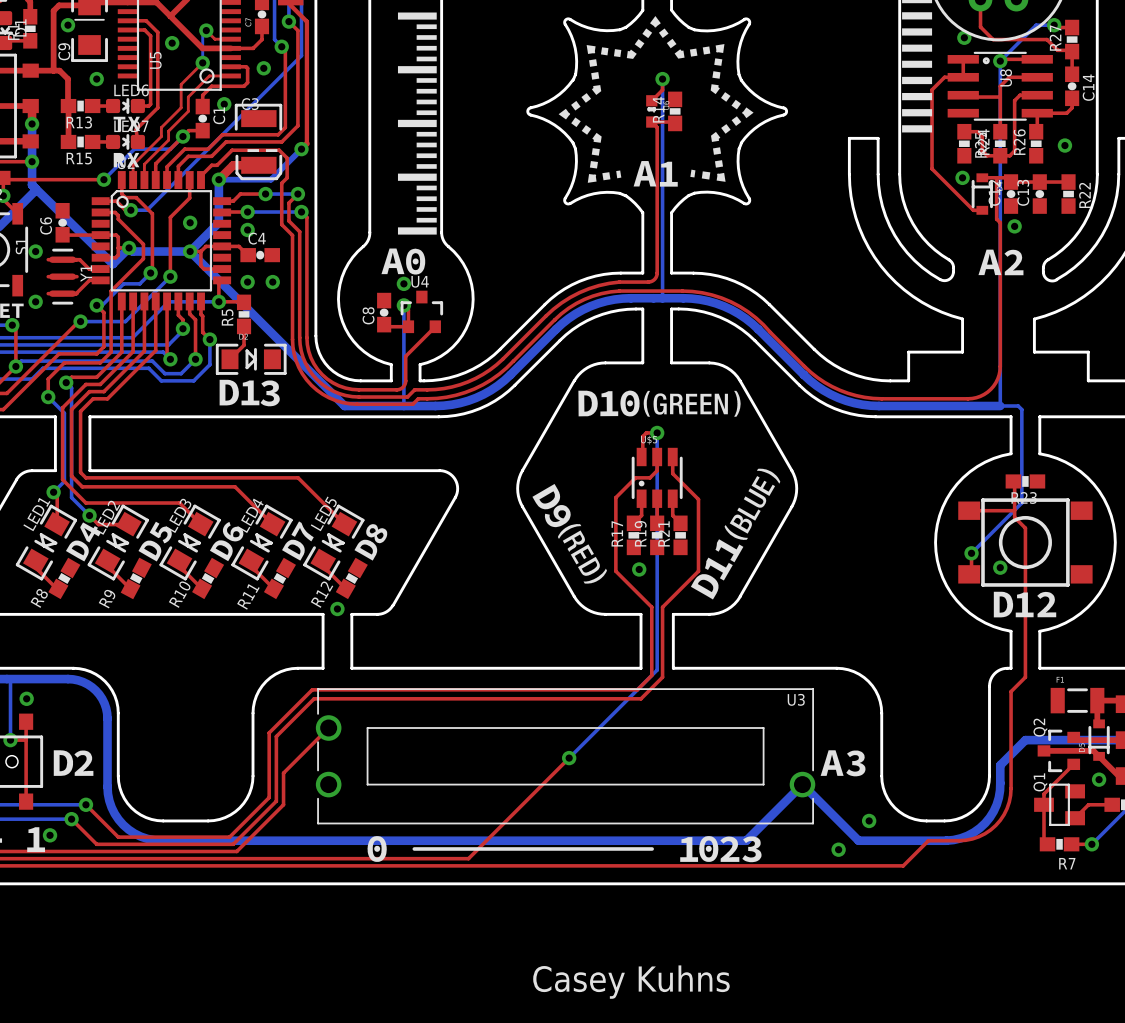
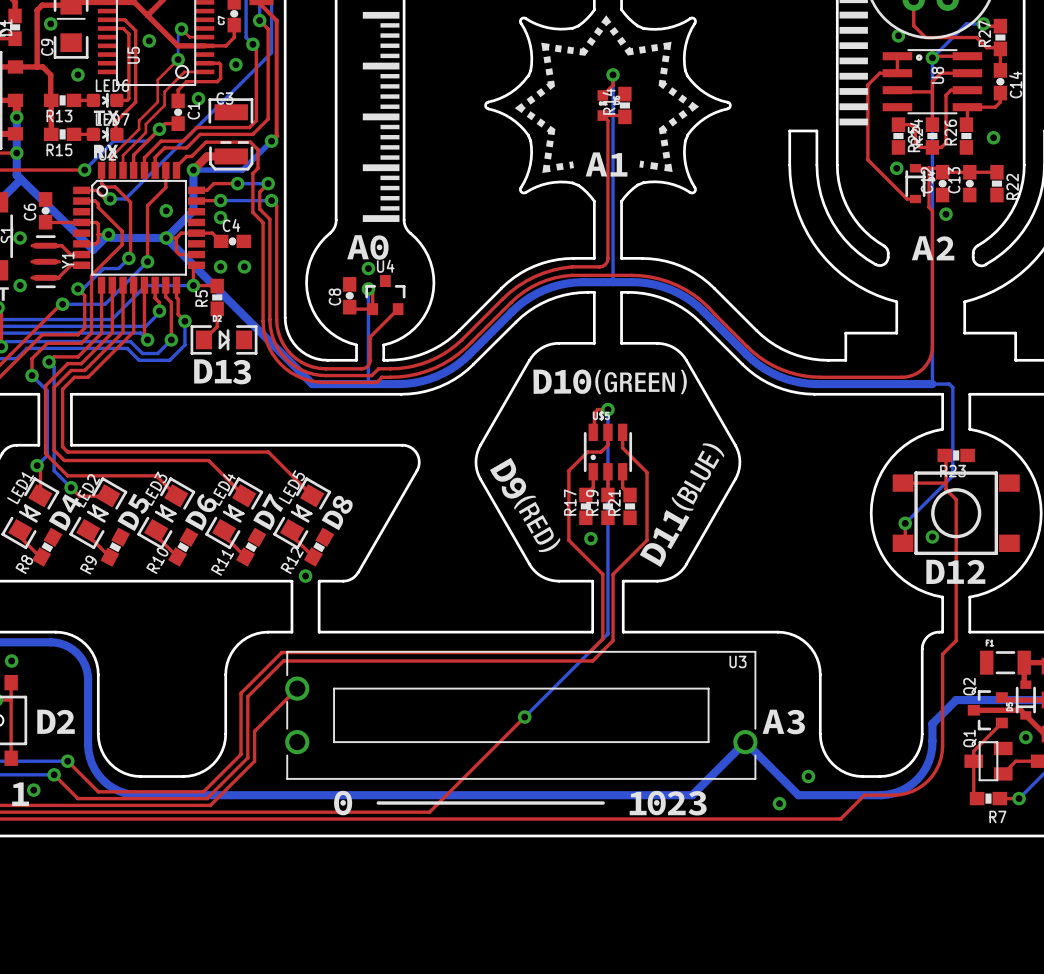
text: Casey Kuhns (631, 982) -> none

